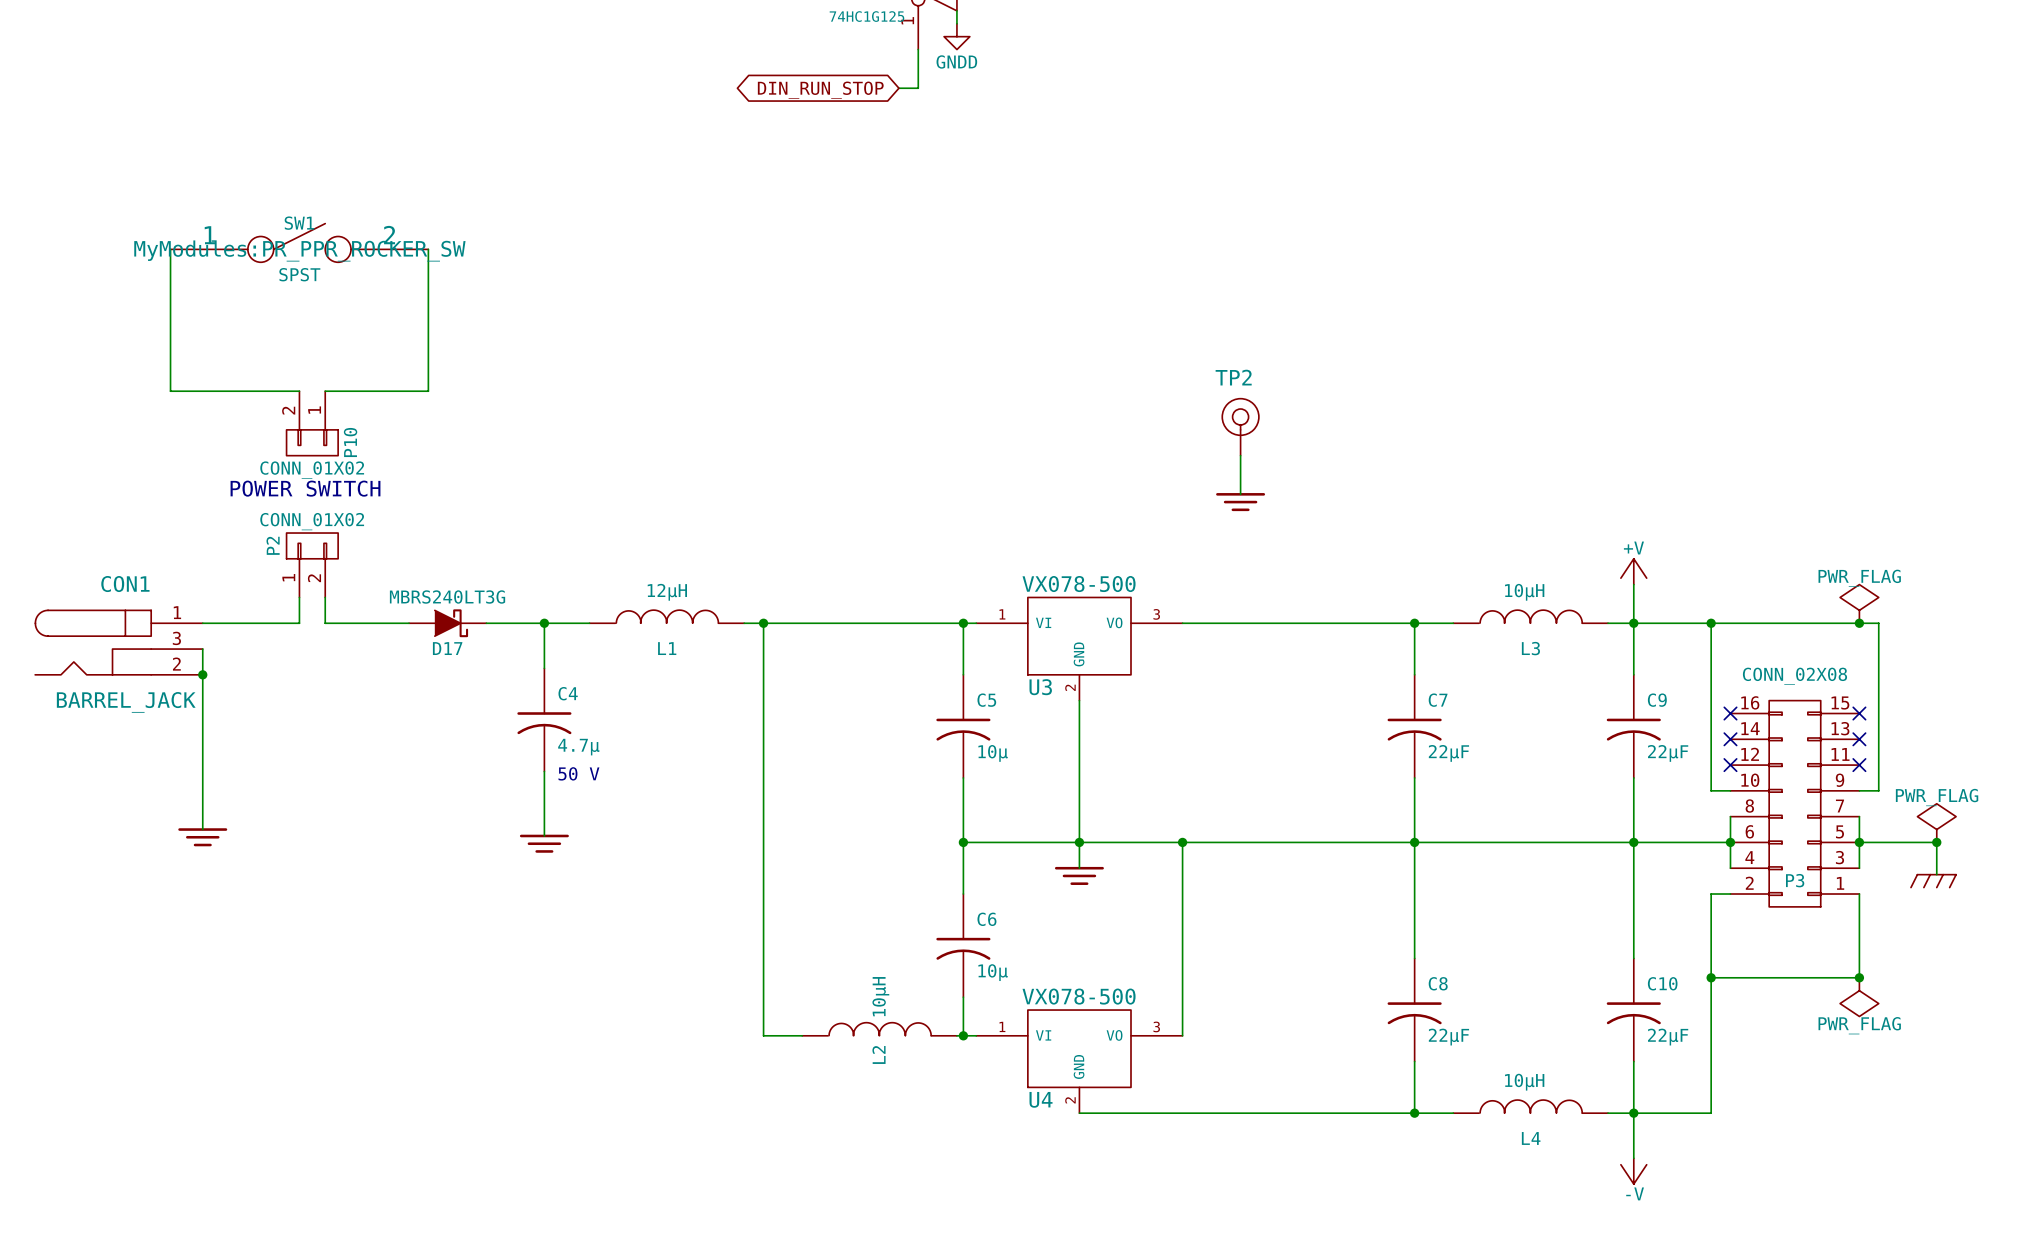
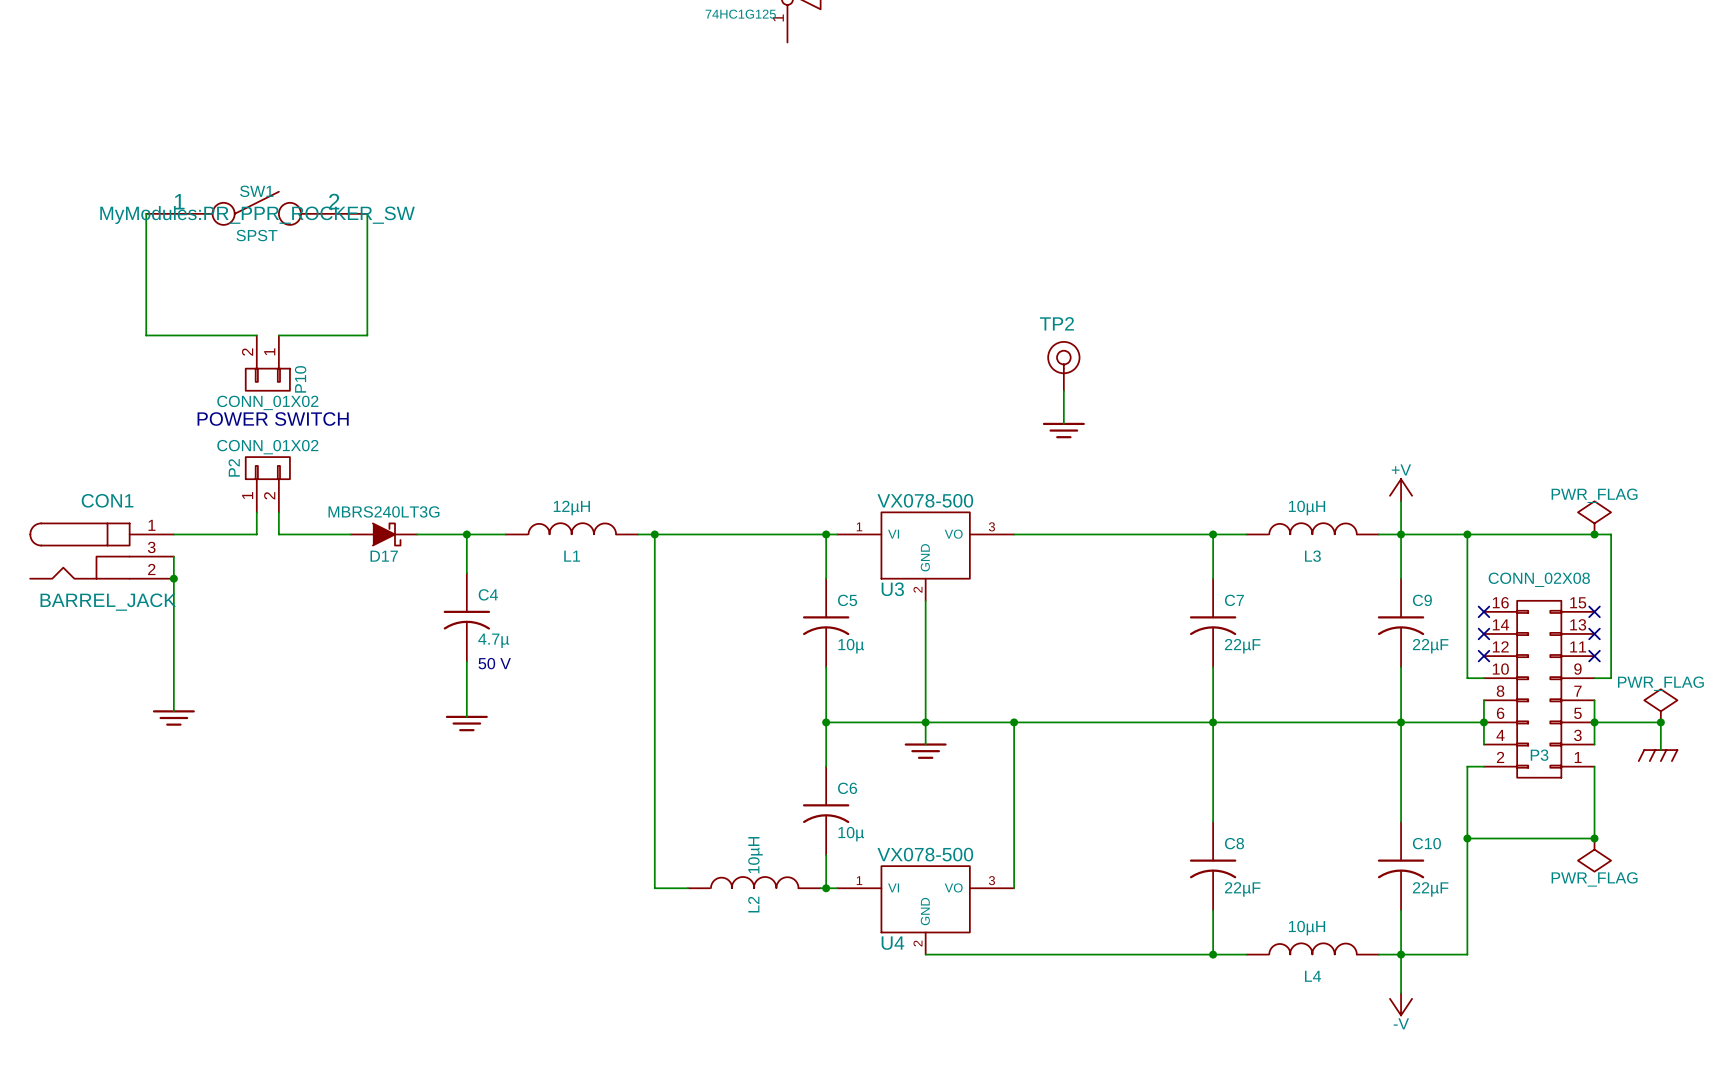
wire: (956, 10) (956, 23) -> none
power symbol: GNDD (956, 36) -> none
wire: (918, 49) (918, 88) (898, 88) -> none
global label: DIN_RUN_STOP (820, 90) -> none

